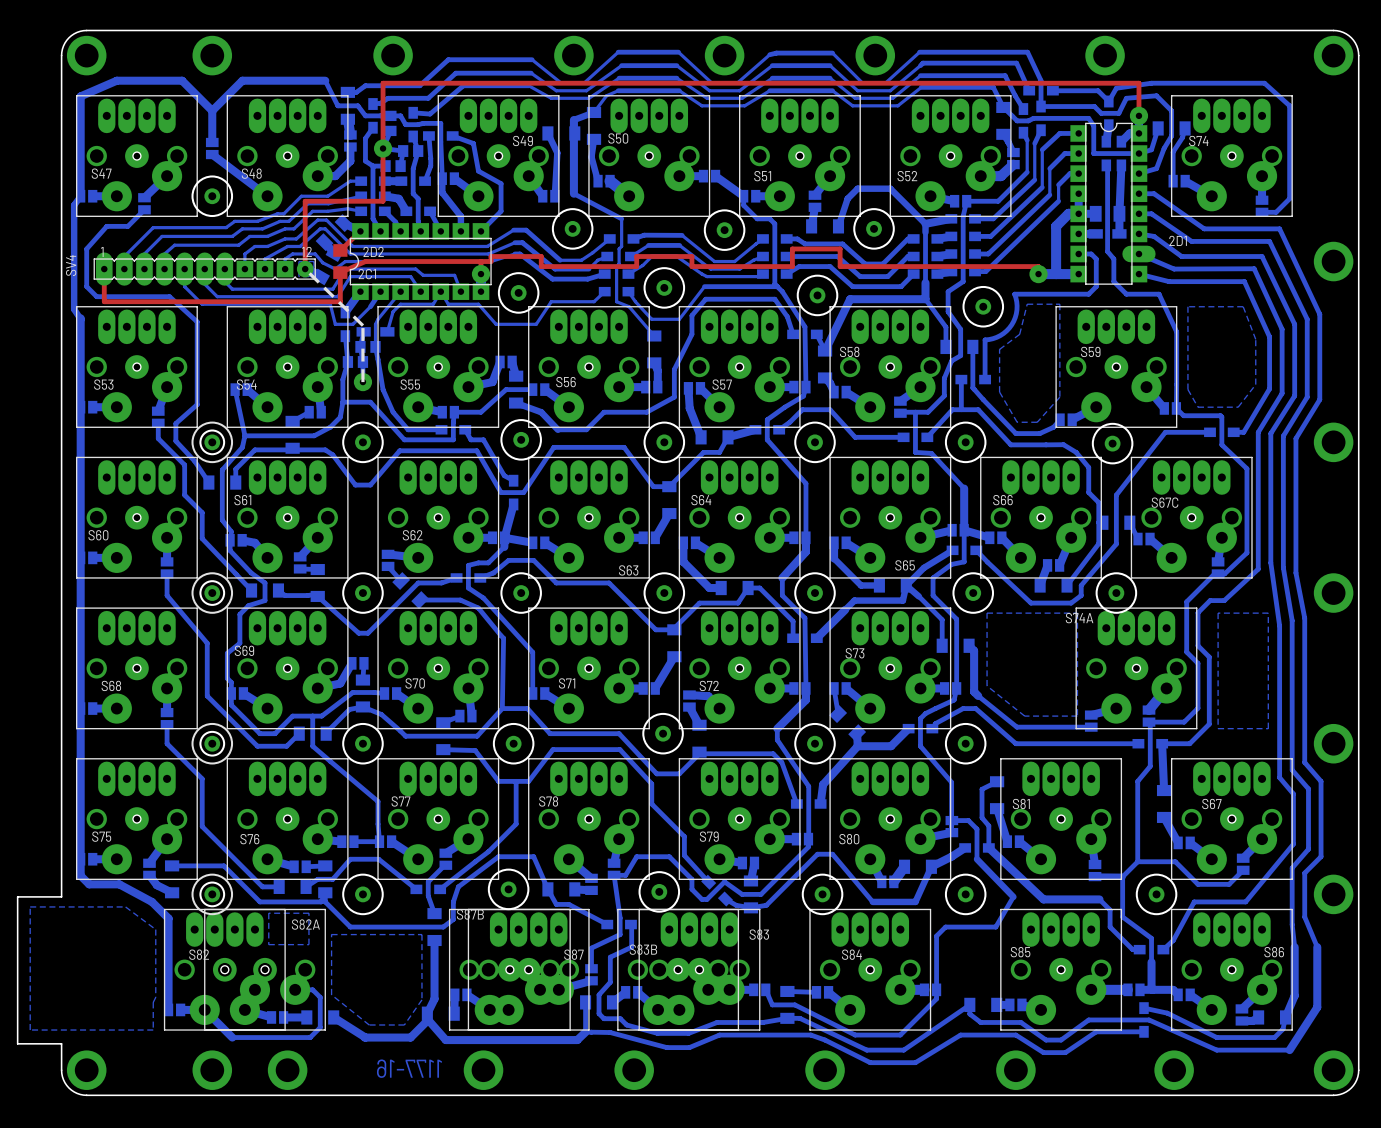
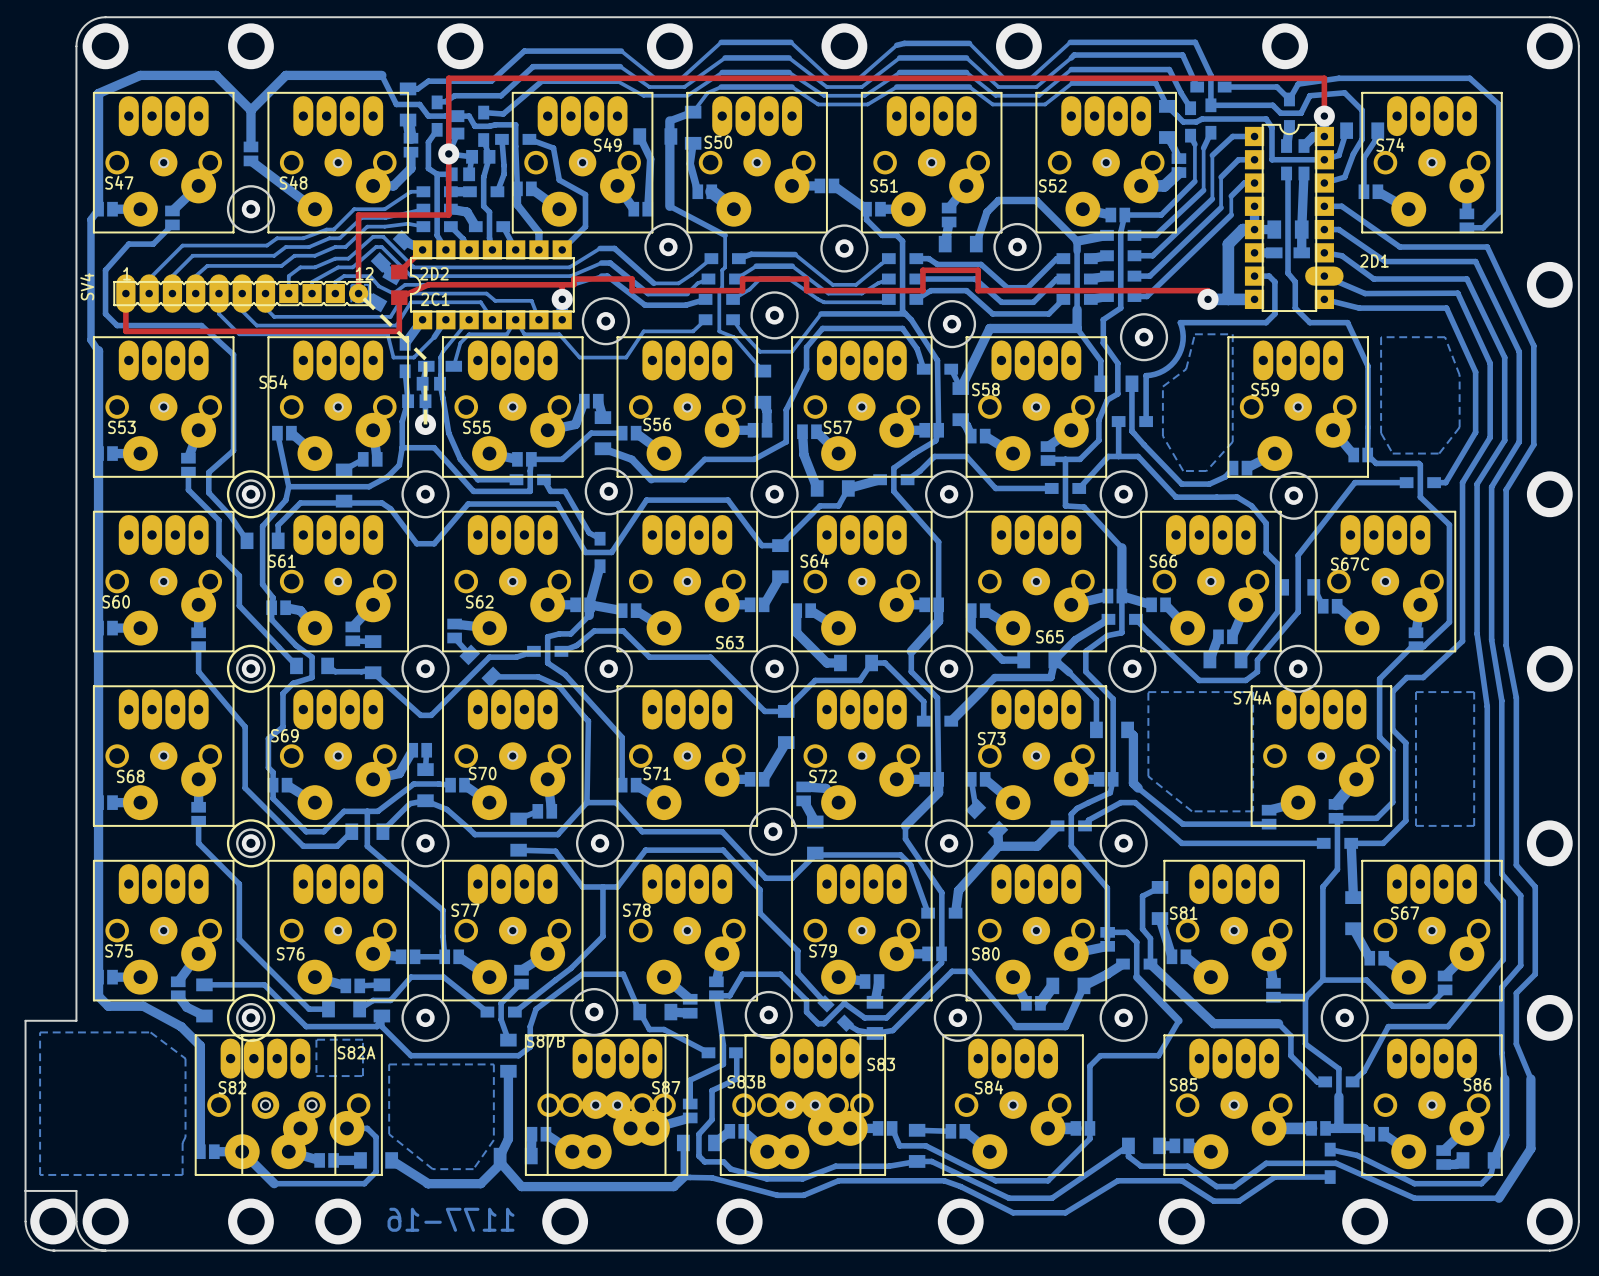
S54 name position: S54 (246, 384) -> S54 (273, 382)
board edge: none -> (25, 1190) (25, 1221) (27, 1232) (36, 1244) (54, 1250)
via: none -> (53, 1221)
board edge: none -> (53, 1250) (105, 1250)

